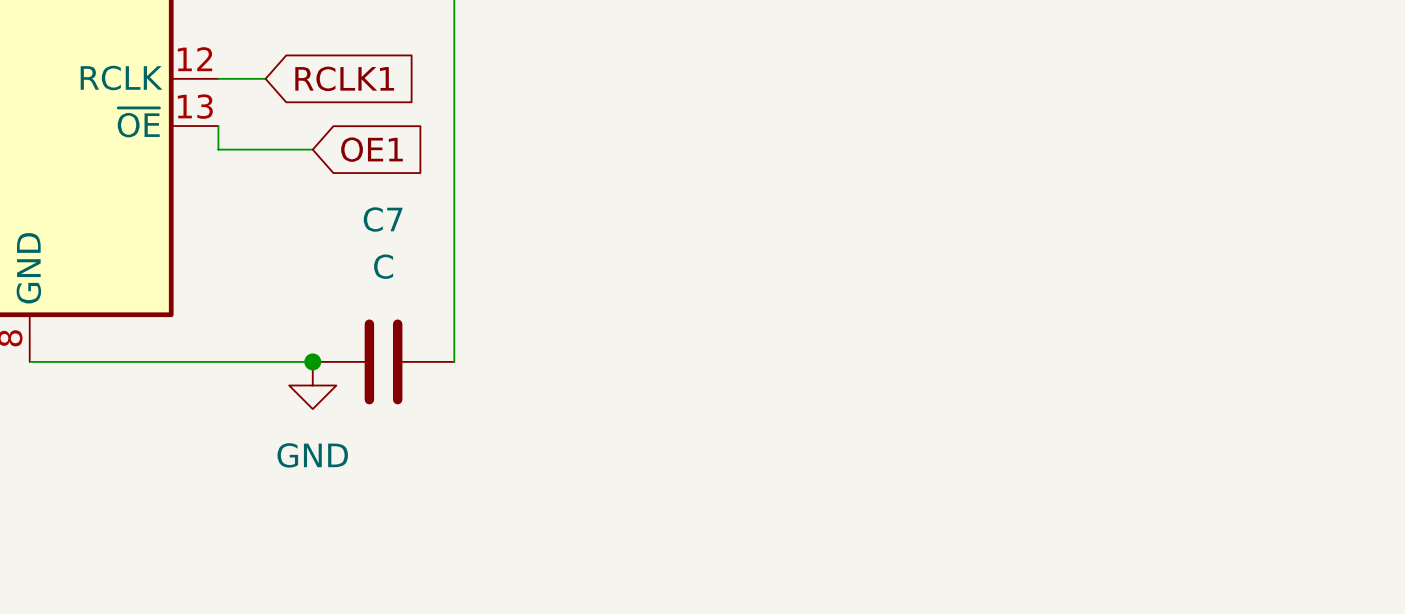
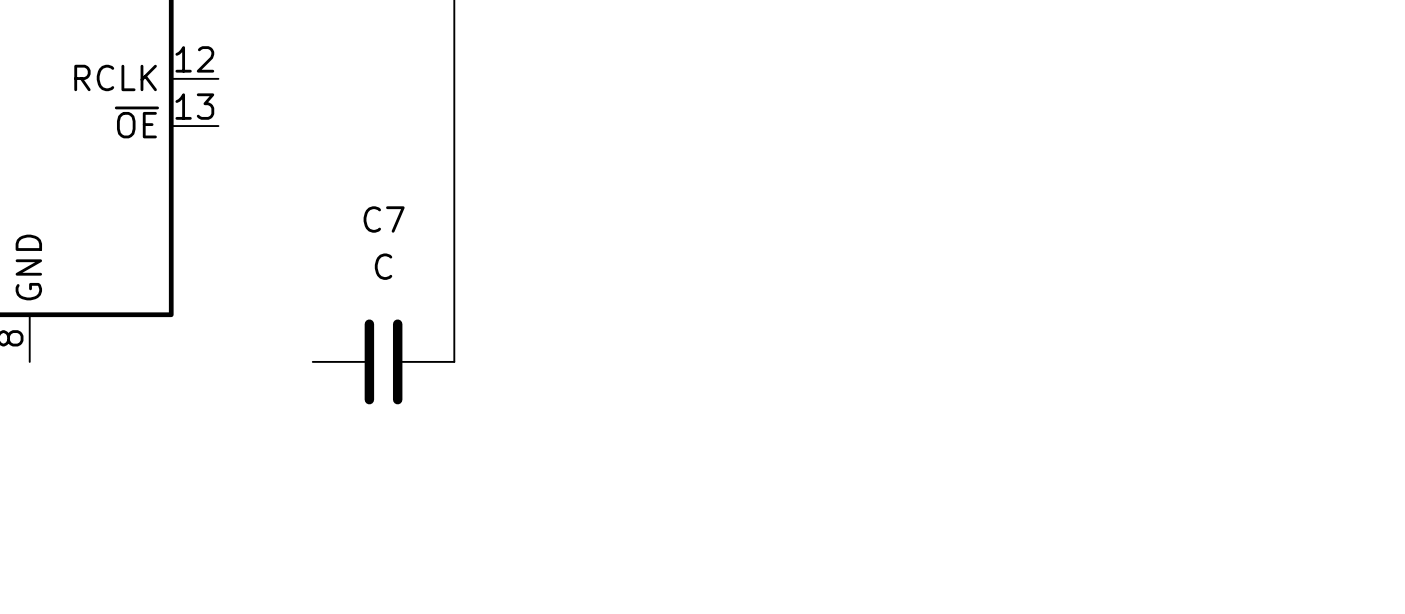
wire: (218, 78) (265, 78) -> none
global label: RCLK1 (344, 78) -> none
wire: (218, 126) (218, 149) (312, 149) -> none
global label: OE1 (371, 149) -> none
wire: (29, 361) (312, 361) -> none
junction: (312, 361) -> none
power symbol: GND (312, 385) -> none

